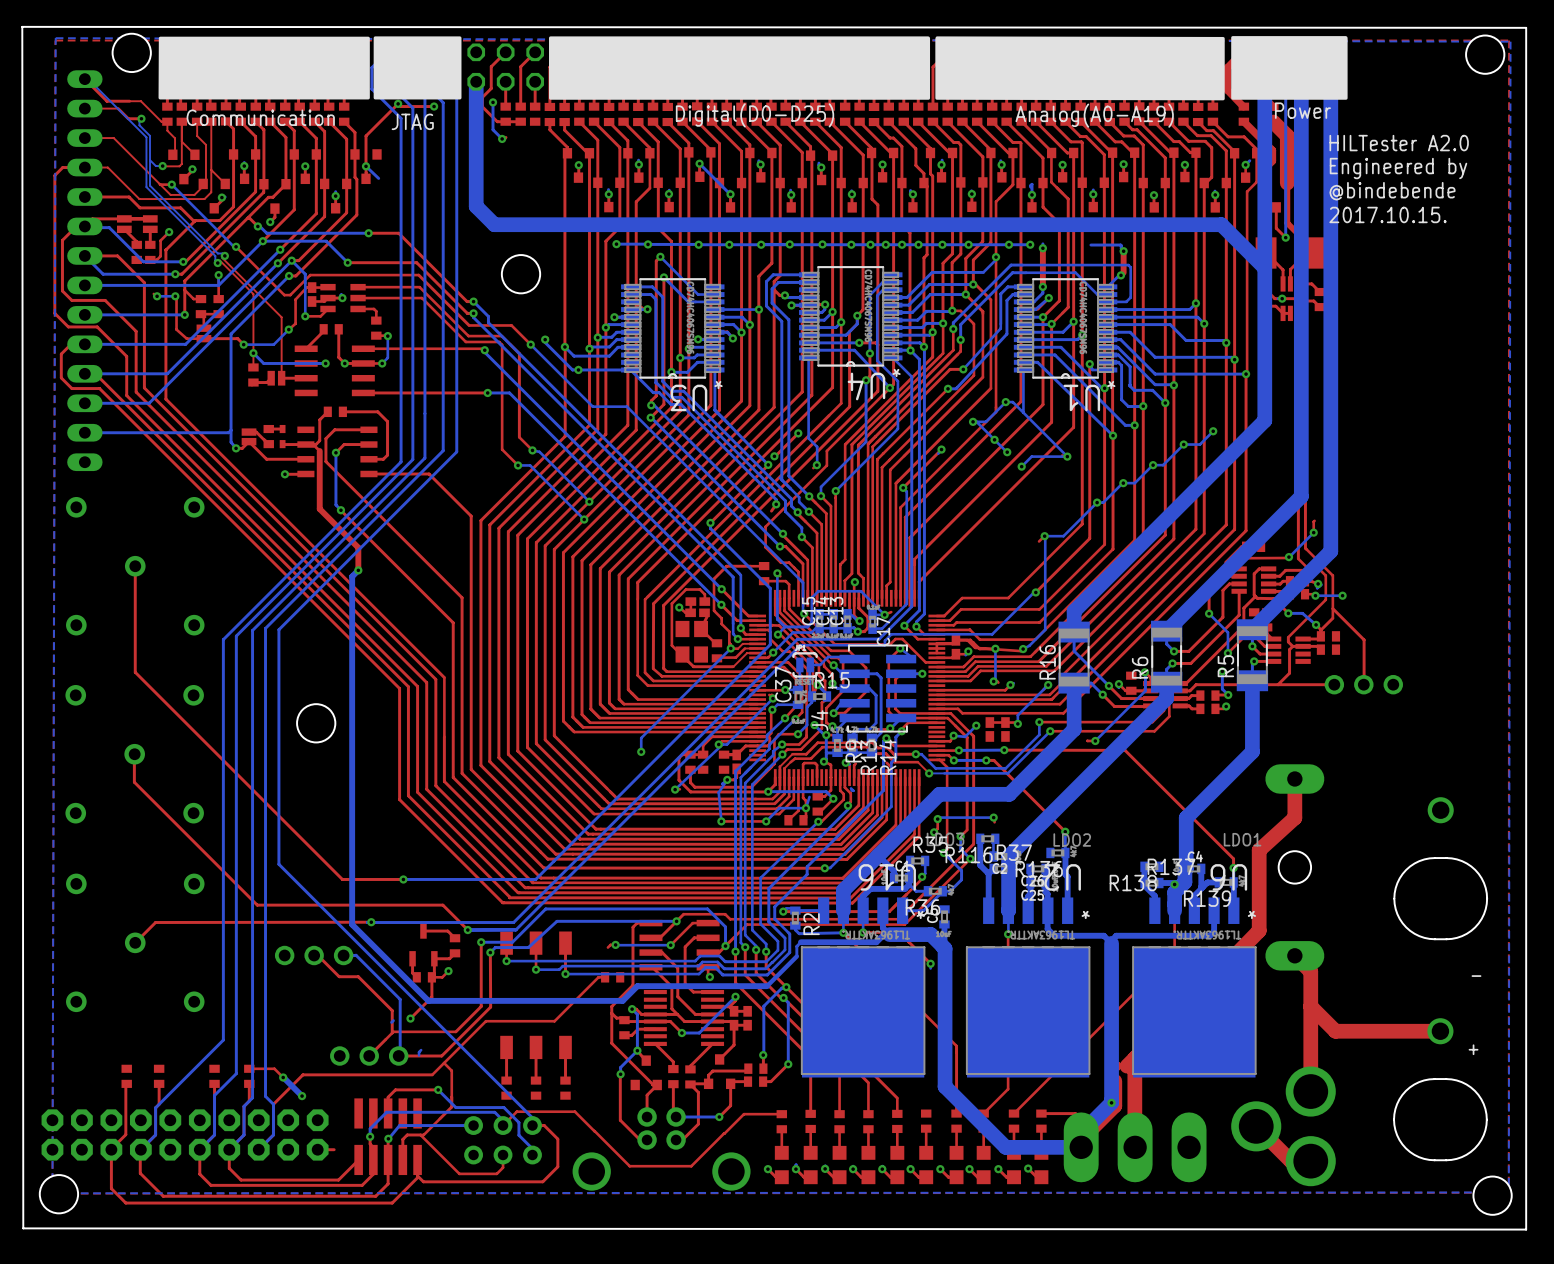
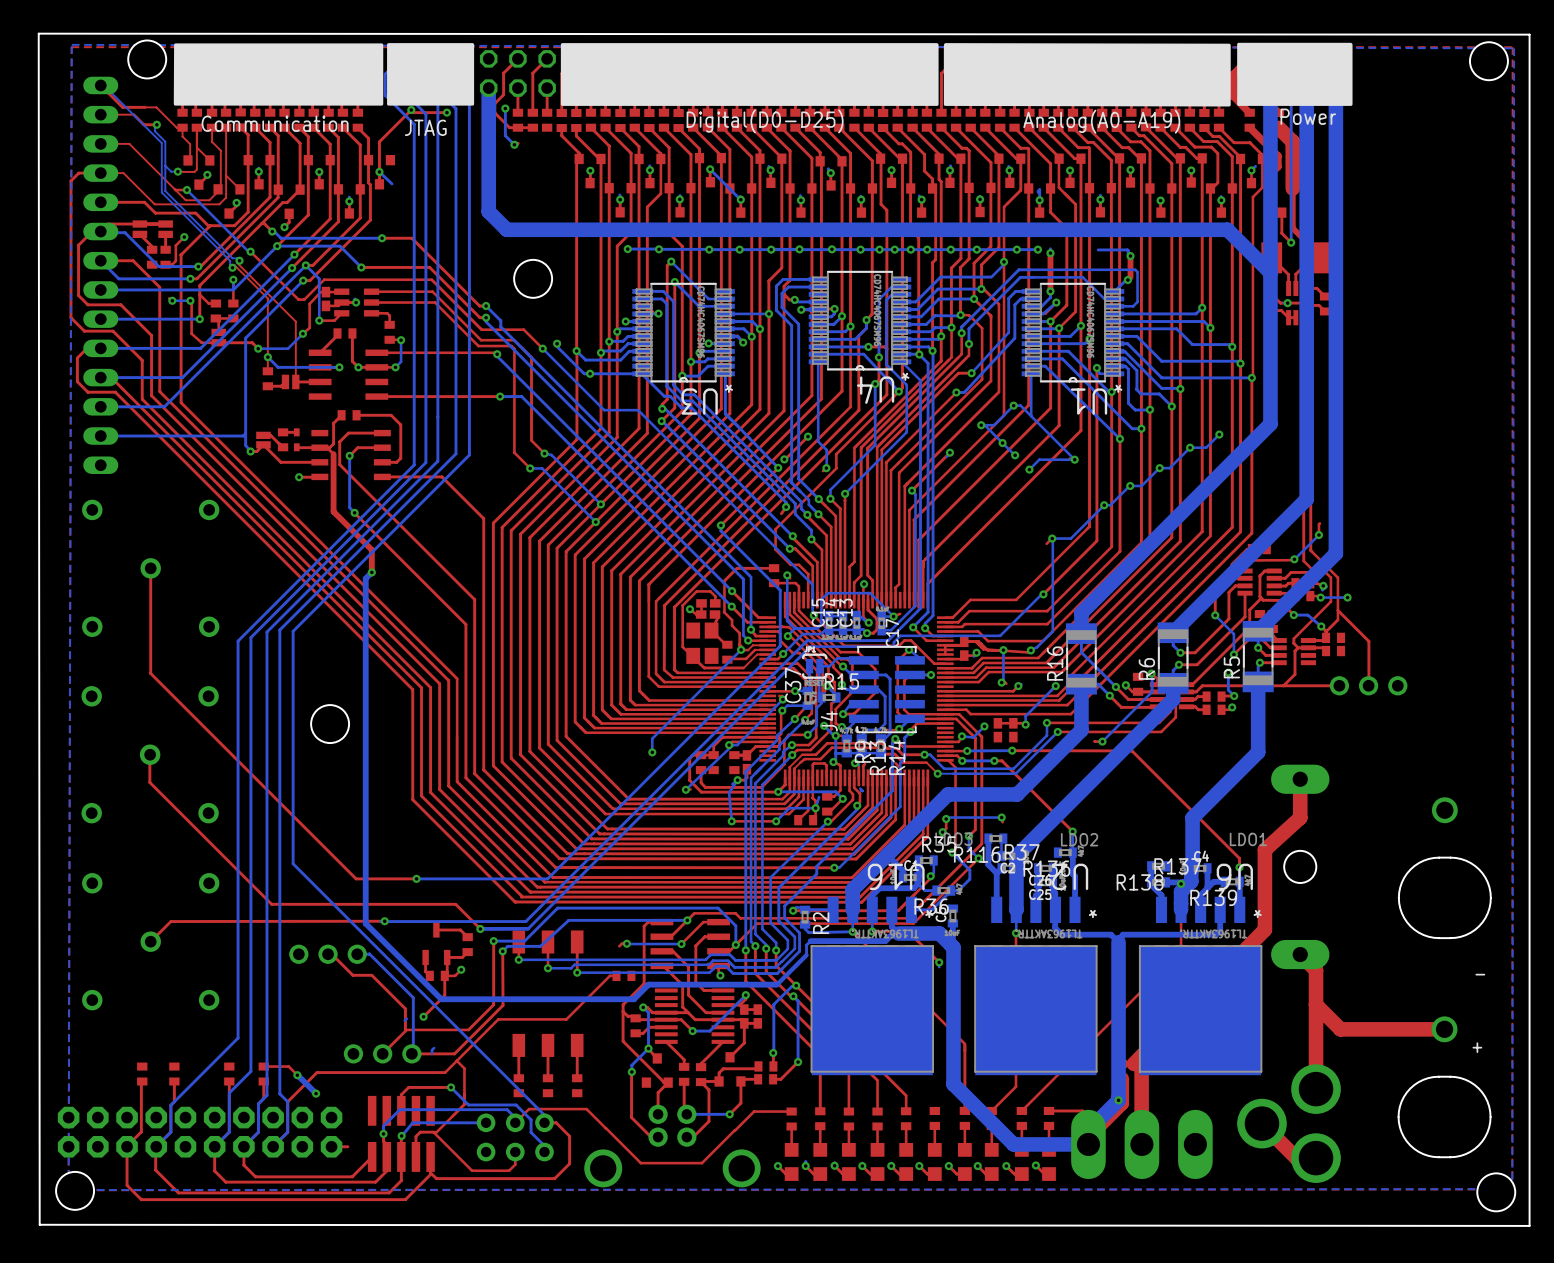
text: HILTester A2.0 (1399, 143) -> none
text: Engineered by (1398, 168) -> none
text: @bindebende (1392, 191) -> none
text: 2017.10.15. (1388, 214) -> none

